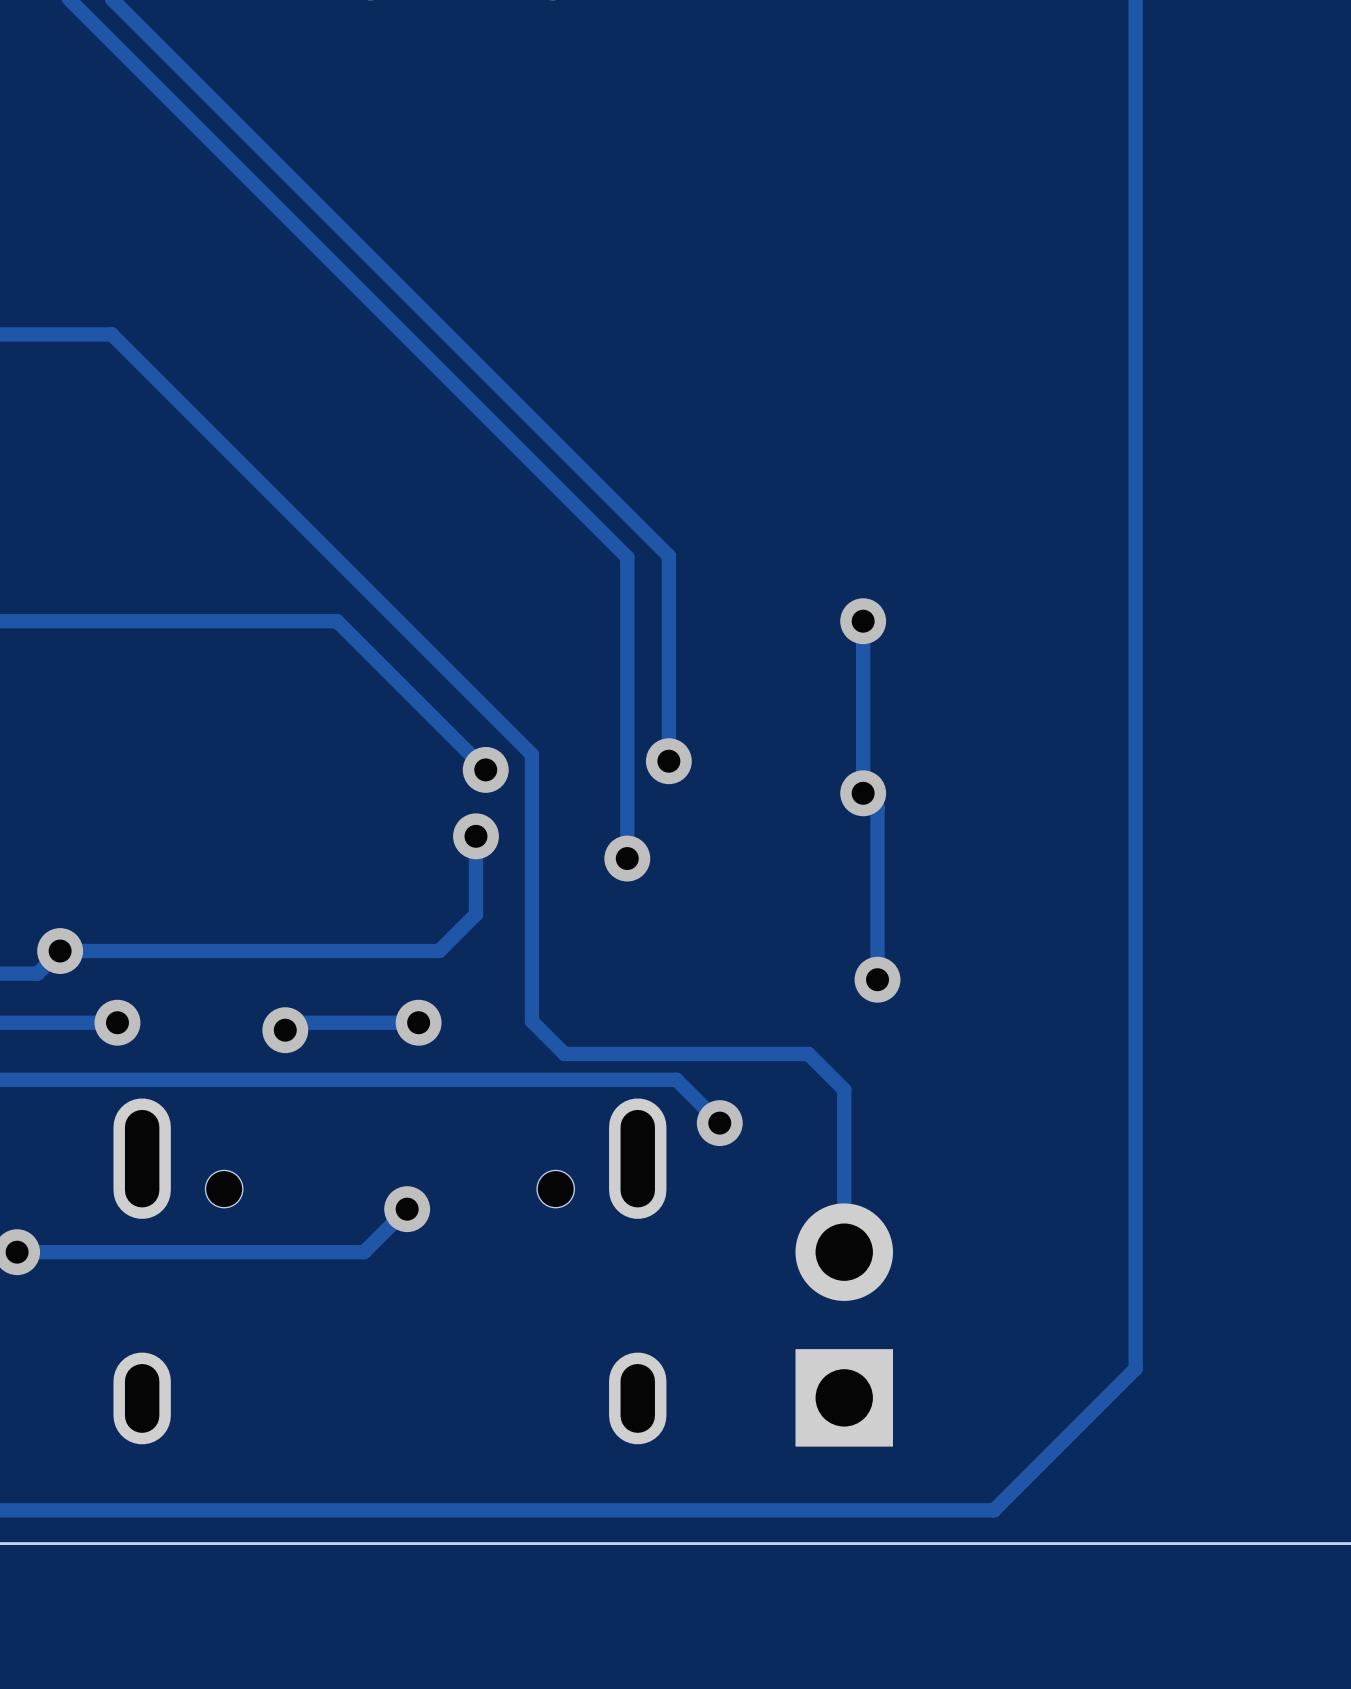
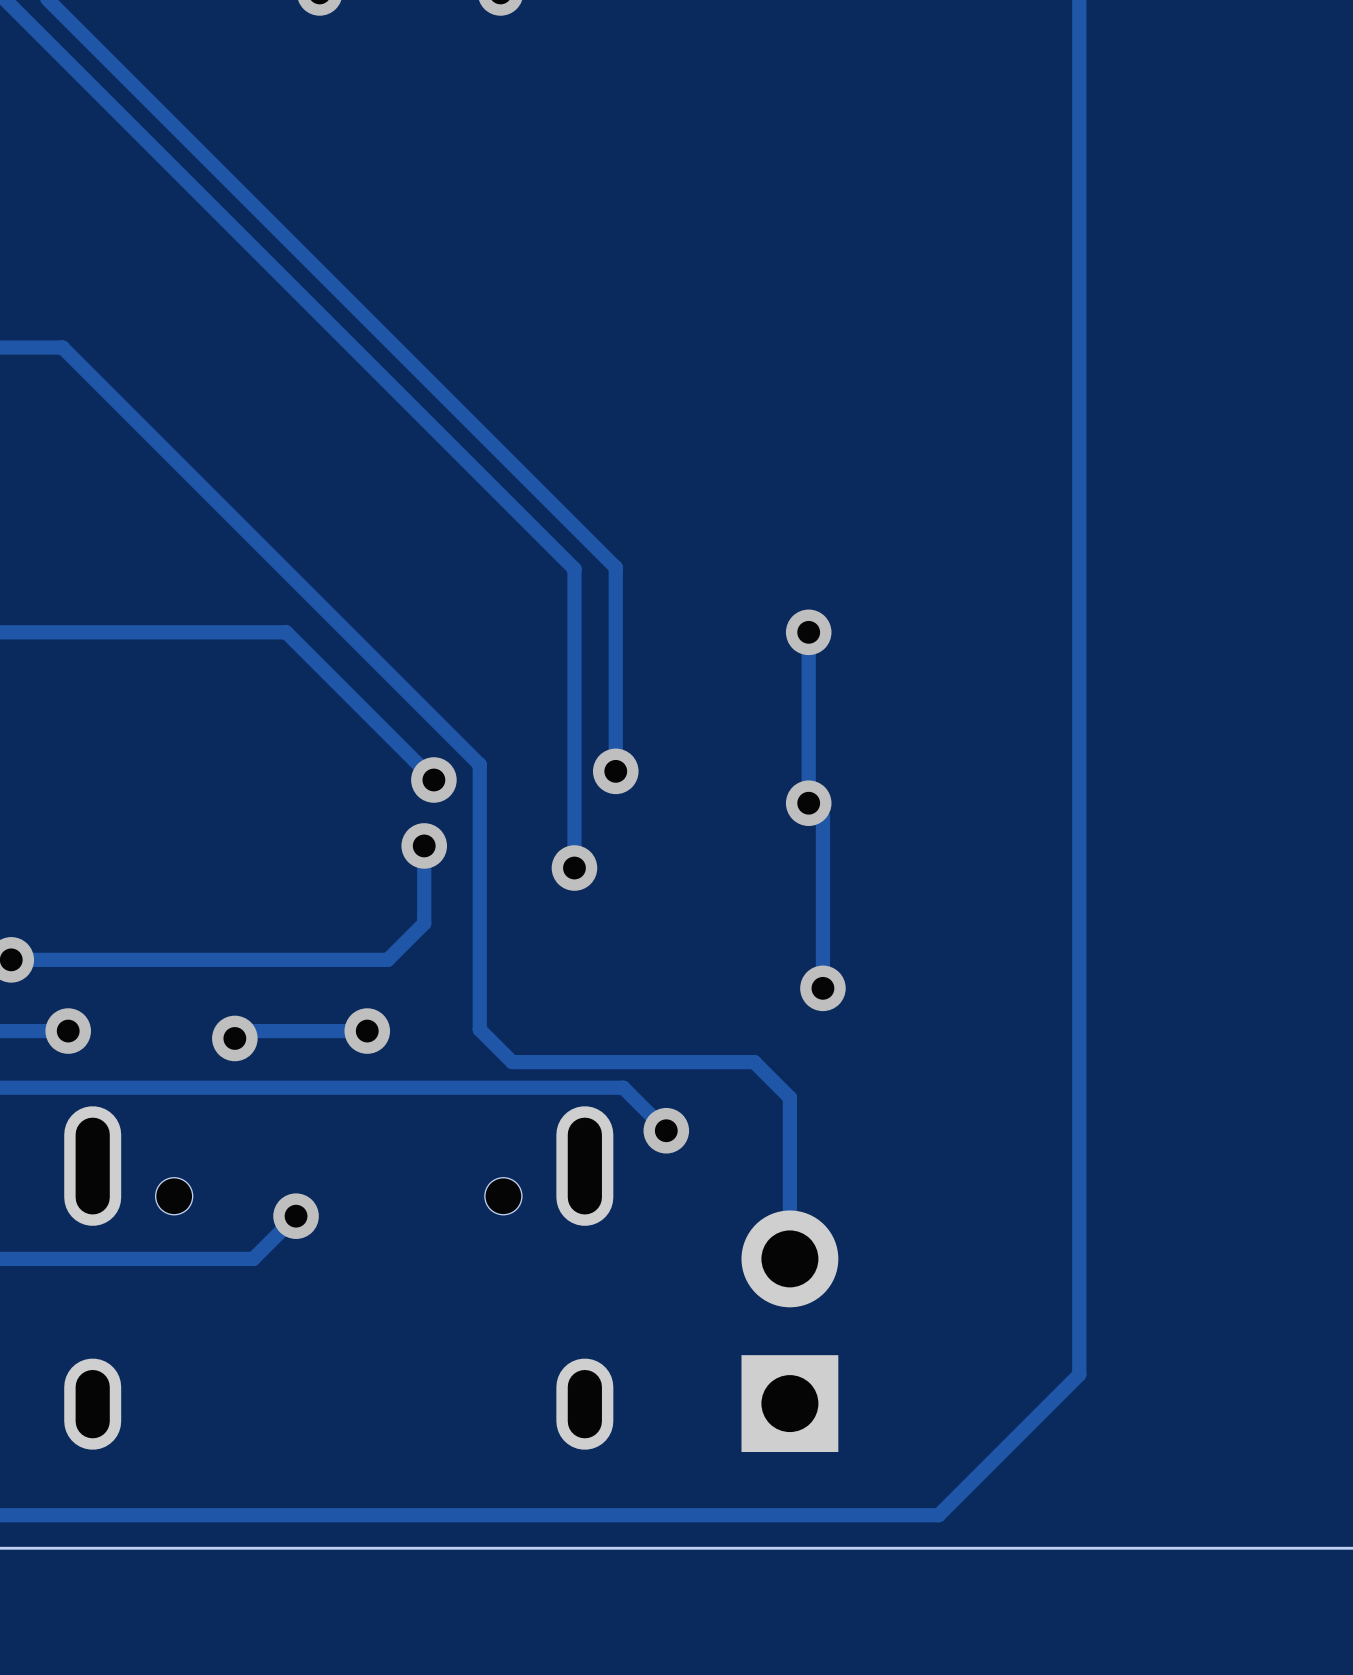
track: (407, 1209) (364, 1252) (303, 1252) -> (296, 1216) (253, 1258)
via position: (407, 1209) -> (296, 1216)

